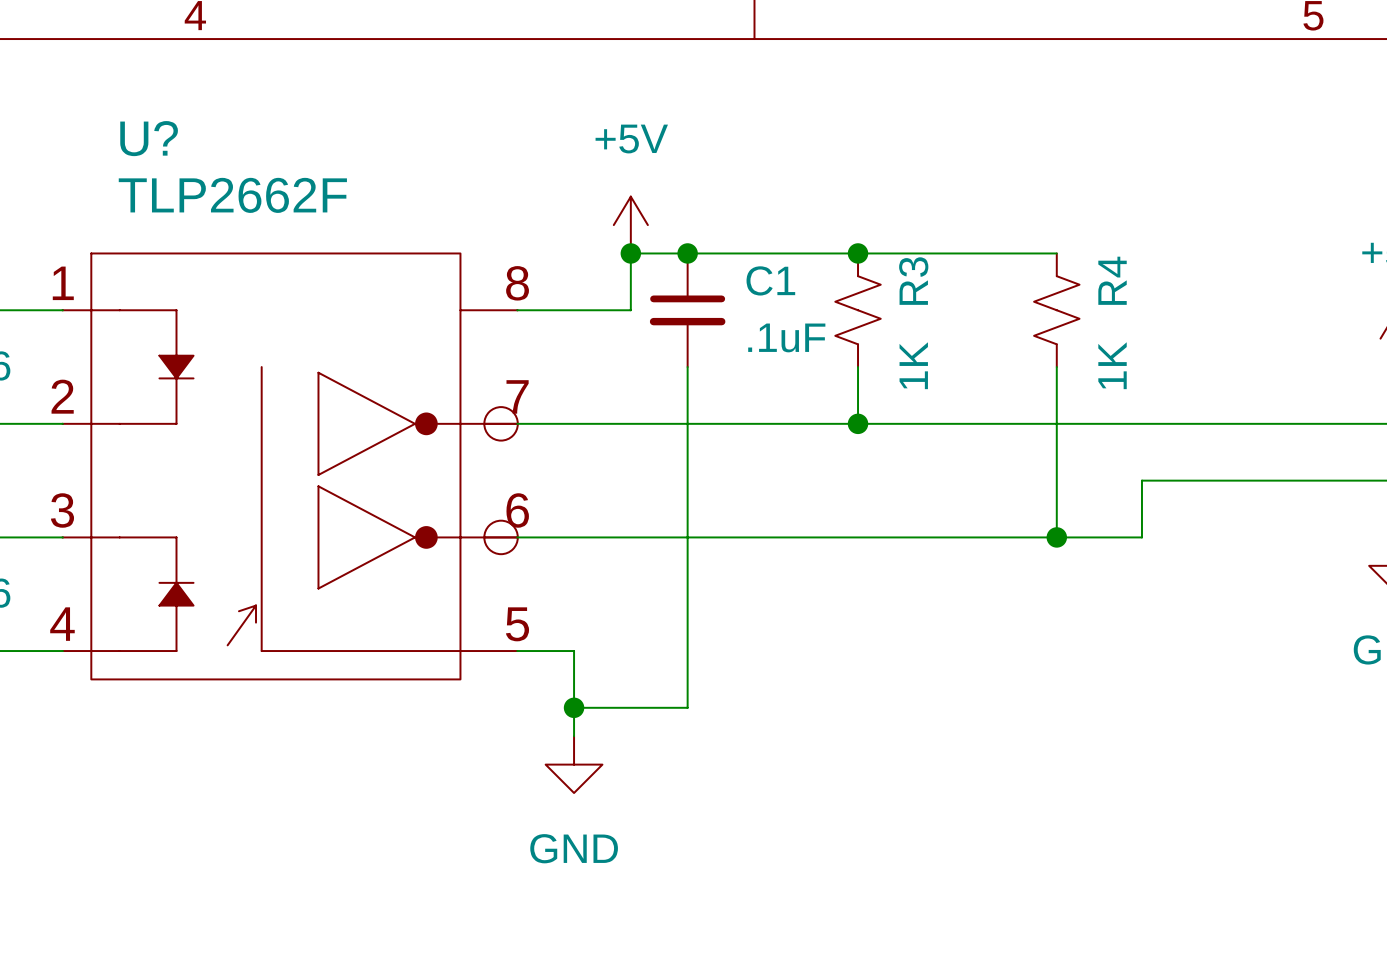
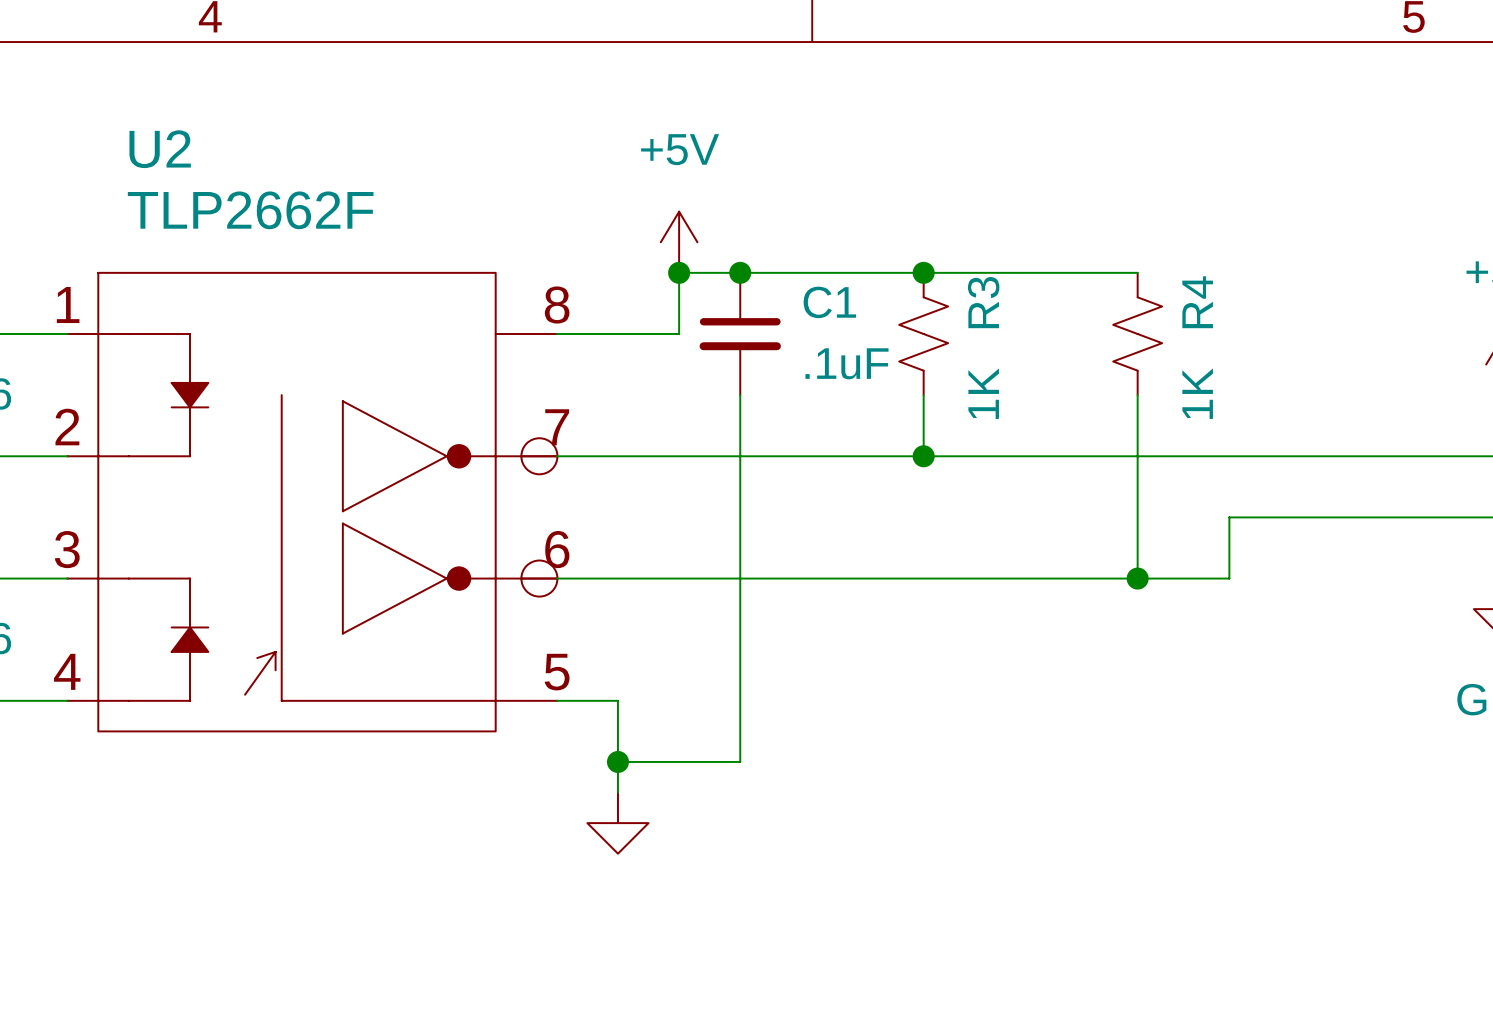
U? name: U? (149, 138) -> U2 (160, 149)
power symbol text: GND (574, 848) -> none

